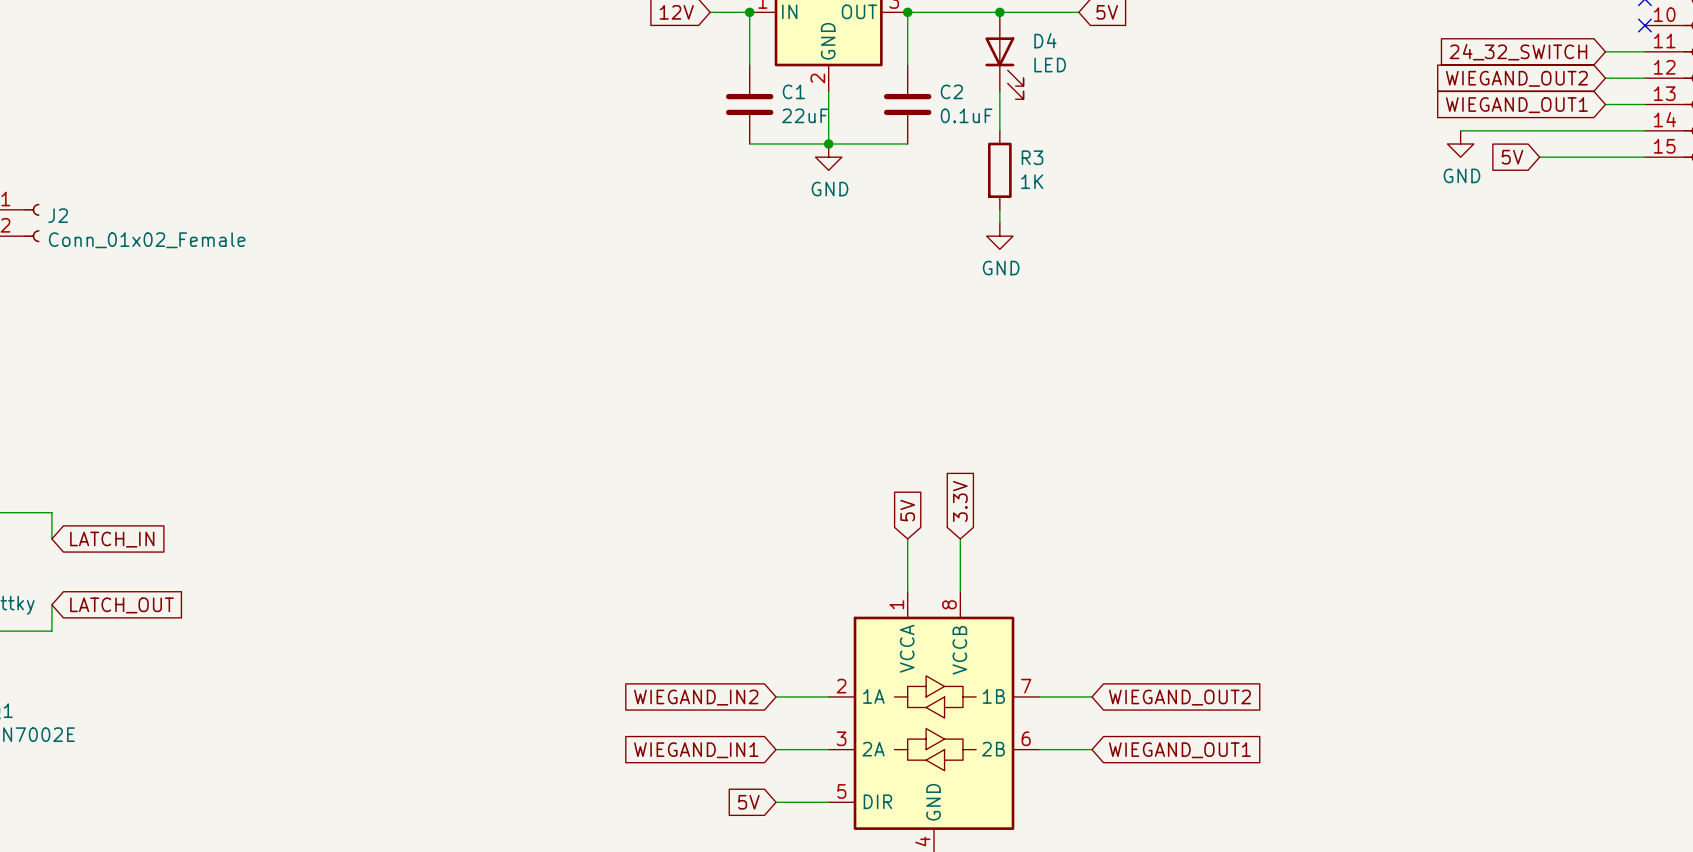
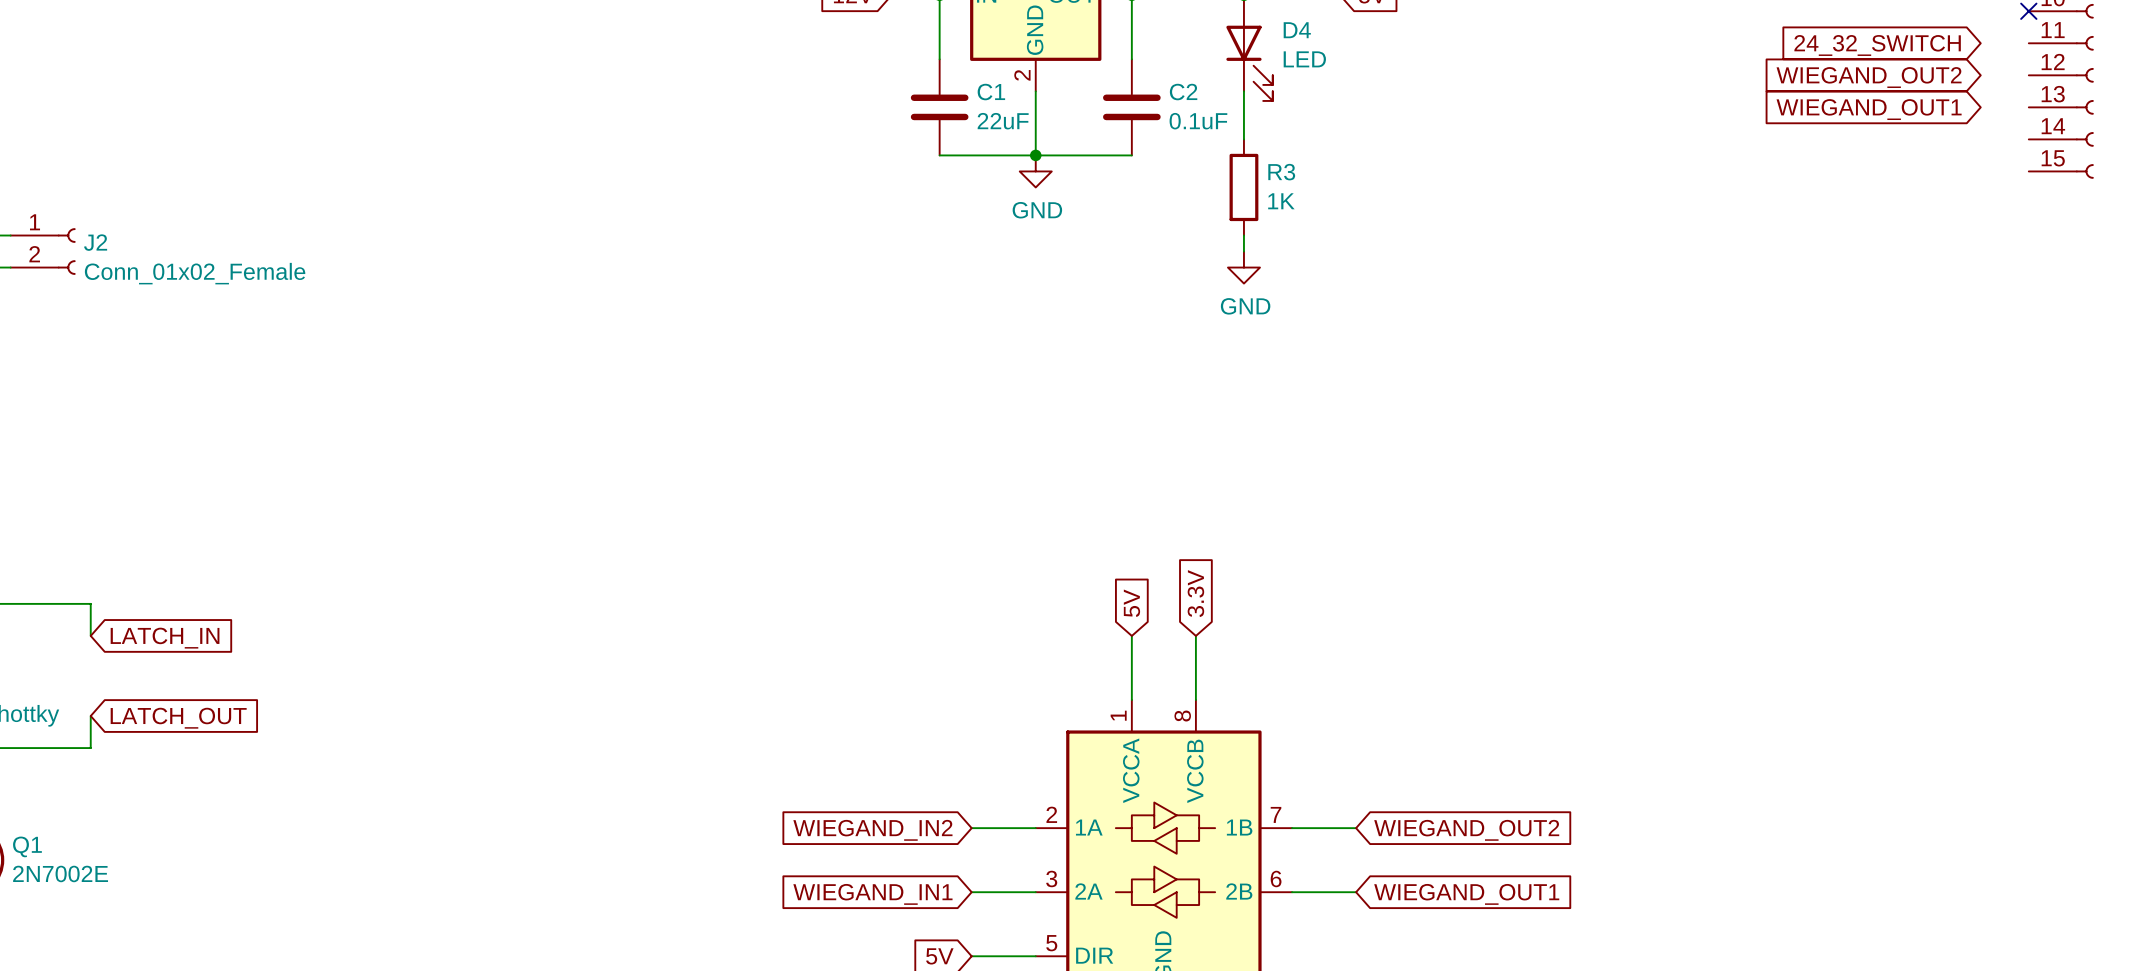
wire: (1605, 51) (1644, 51) -> none
wire: (1605, 78) (1644, 78) -> none
wire: (1605, 104) (1644, 104) -> none
wire: (1460, 130) (1644, 130) -> none
power symbol: GND (1460, 144) -> none
global label: 5V (1512, 157) -> none
wire: (1539, 157) (1644, 157) -> none

